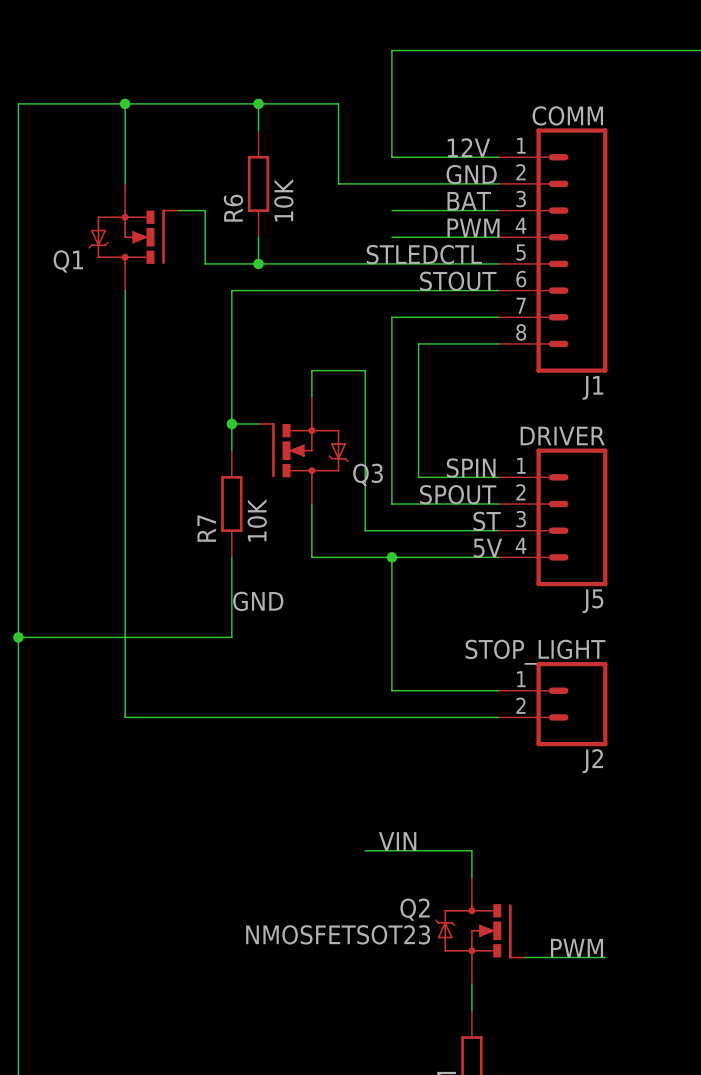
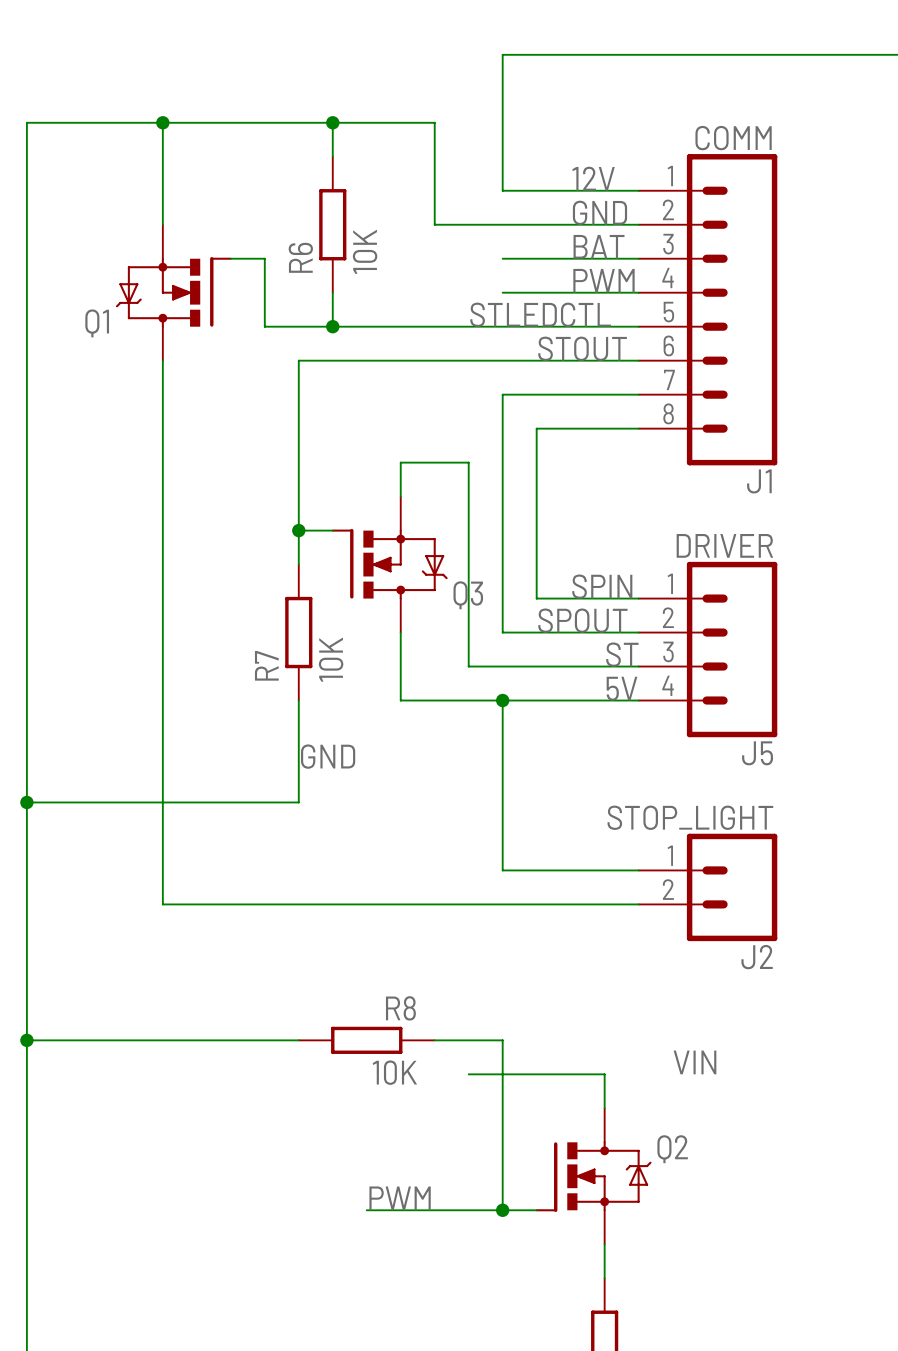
wire: none -> (26, 1040) (298, 1040)
junction: none -> (26, 1040)
R8: none -> 10K (366, 1040)
wire: none -> (434, 1040) (502, 1040) (502, 1210)
label position: VIN (397, 841) -> VIN (695, 1062)
Q2 flip: as is (480, 931) -> left-right (593, 1176)
Q2 value: NMOSFETSOT23 (338, 934) -> none
label: none -> PWM (400, 1198)
label: PWM (577, 948) -> none
wire: none -> (366, 1210) (536, 1210)
junction: none -> (502, 1210)
wire: (525, 957) (605, 957) -> none

